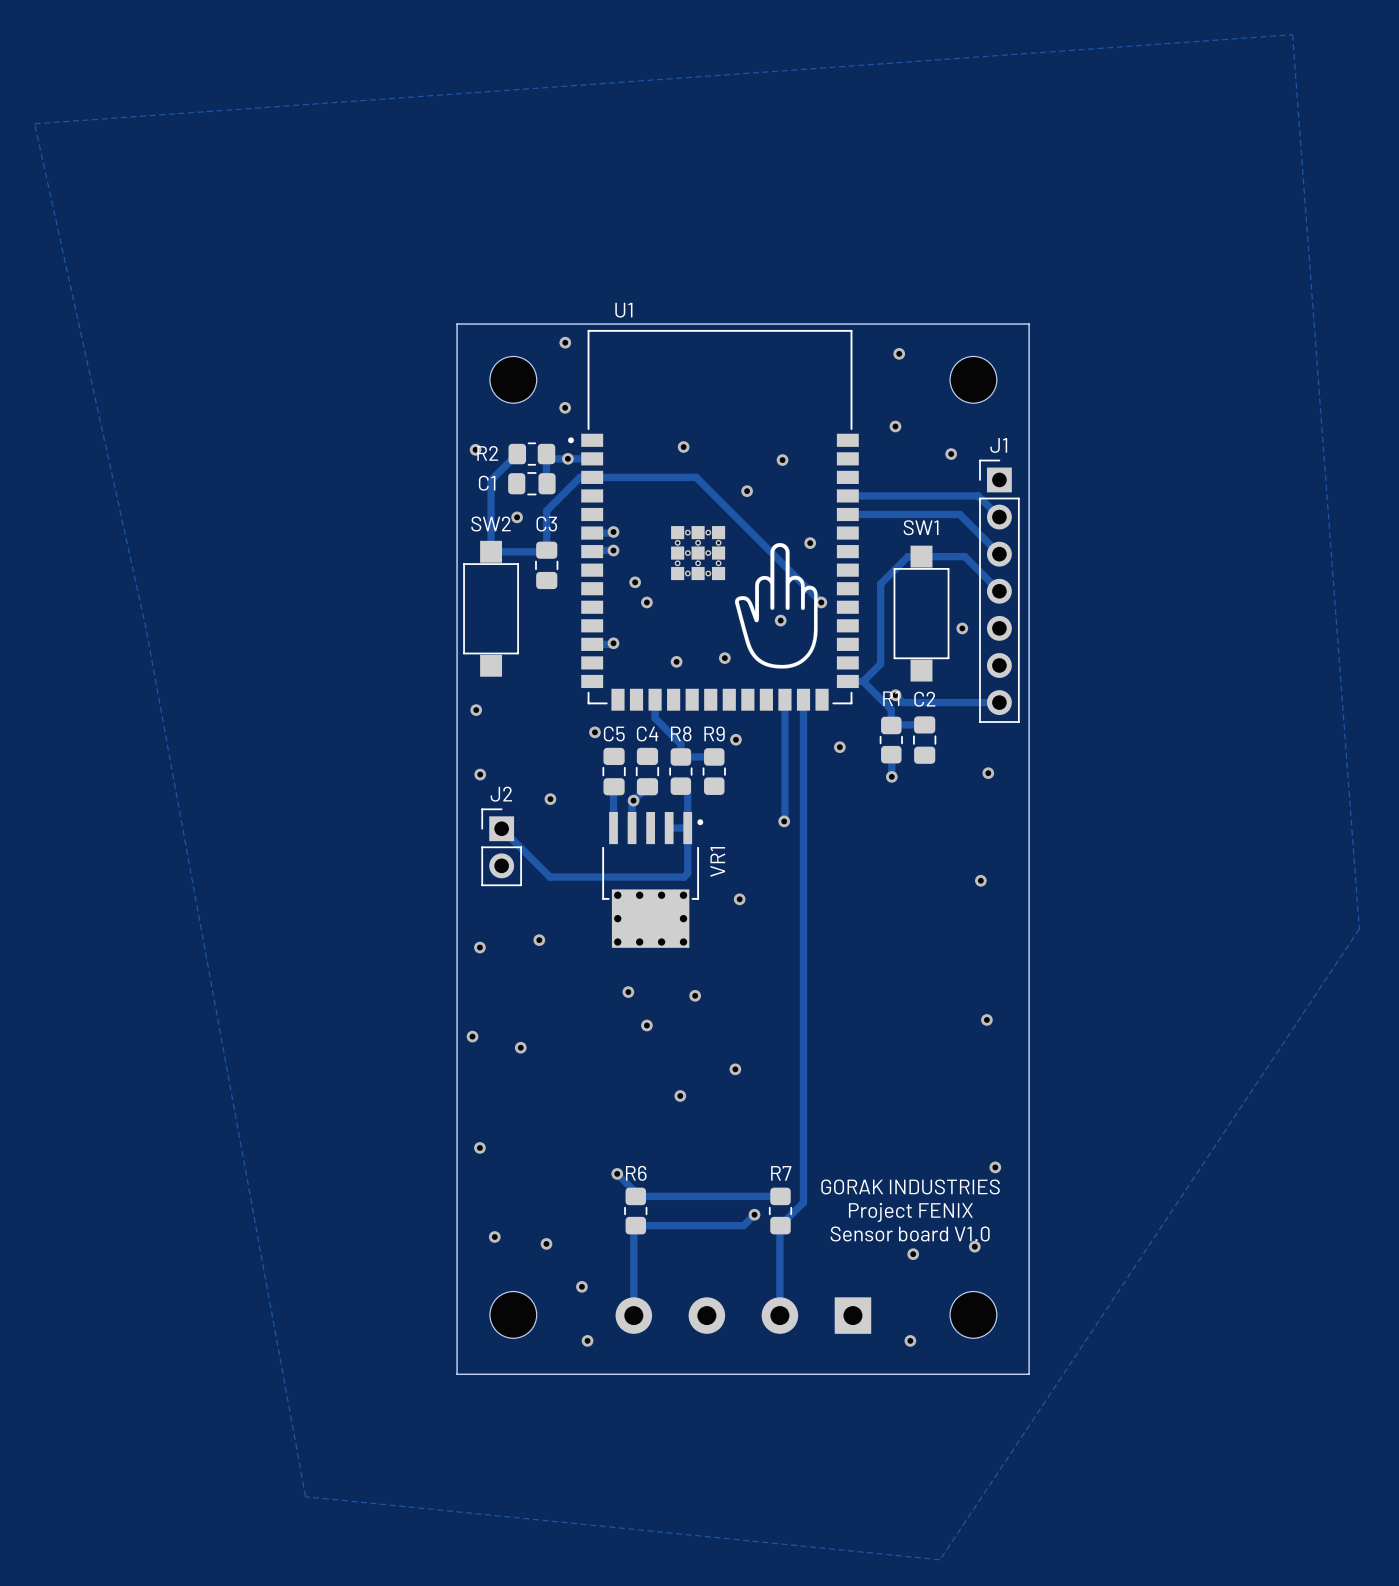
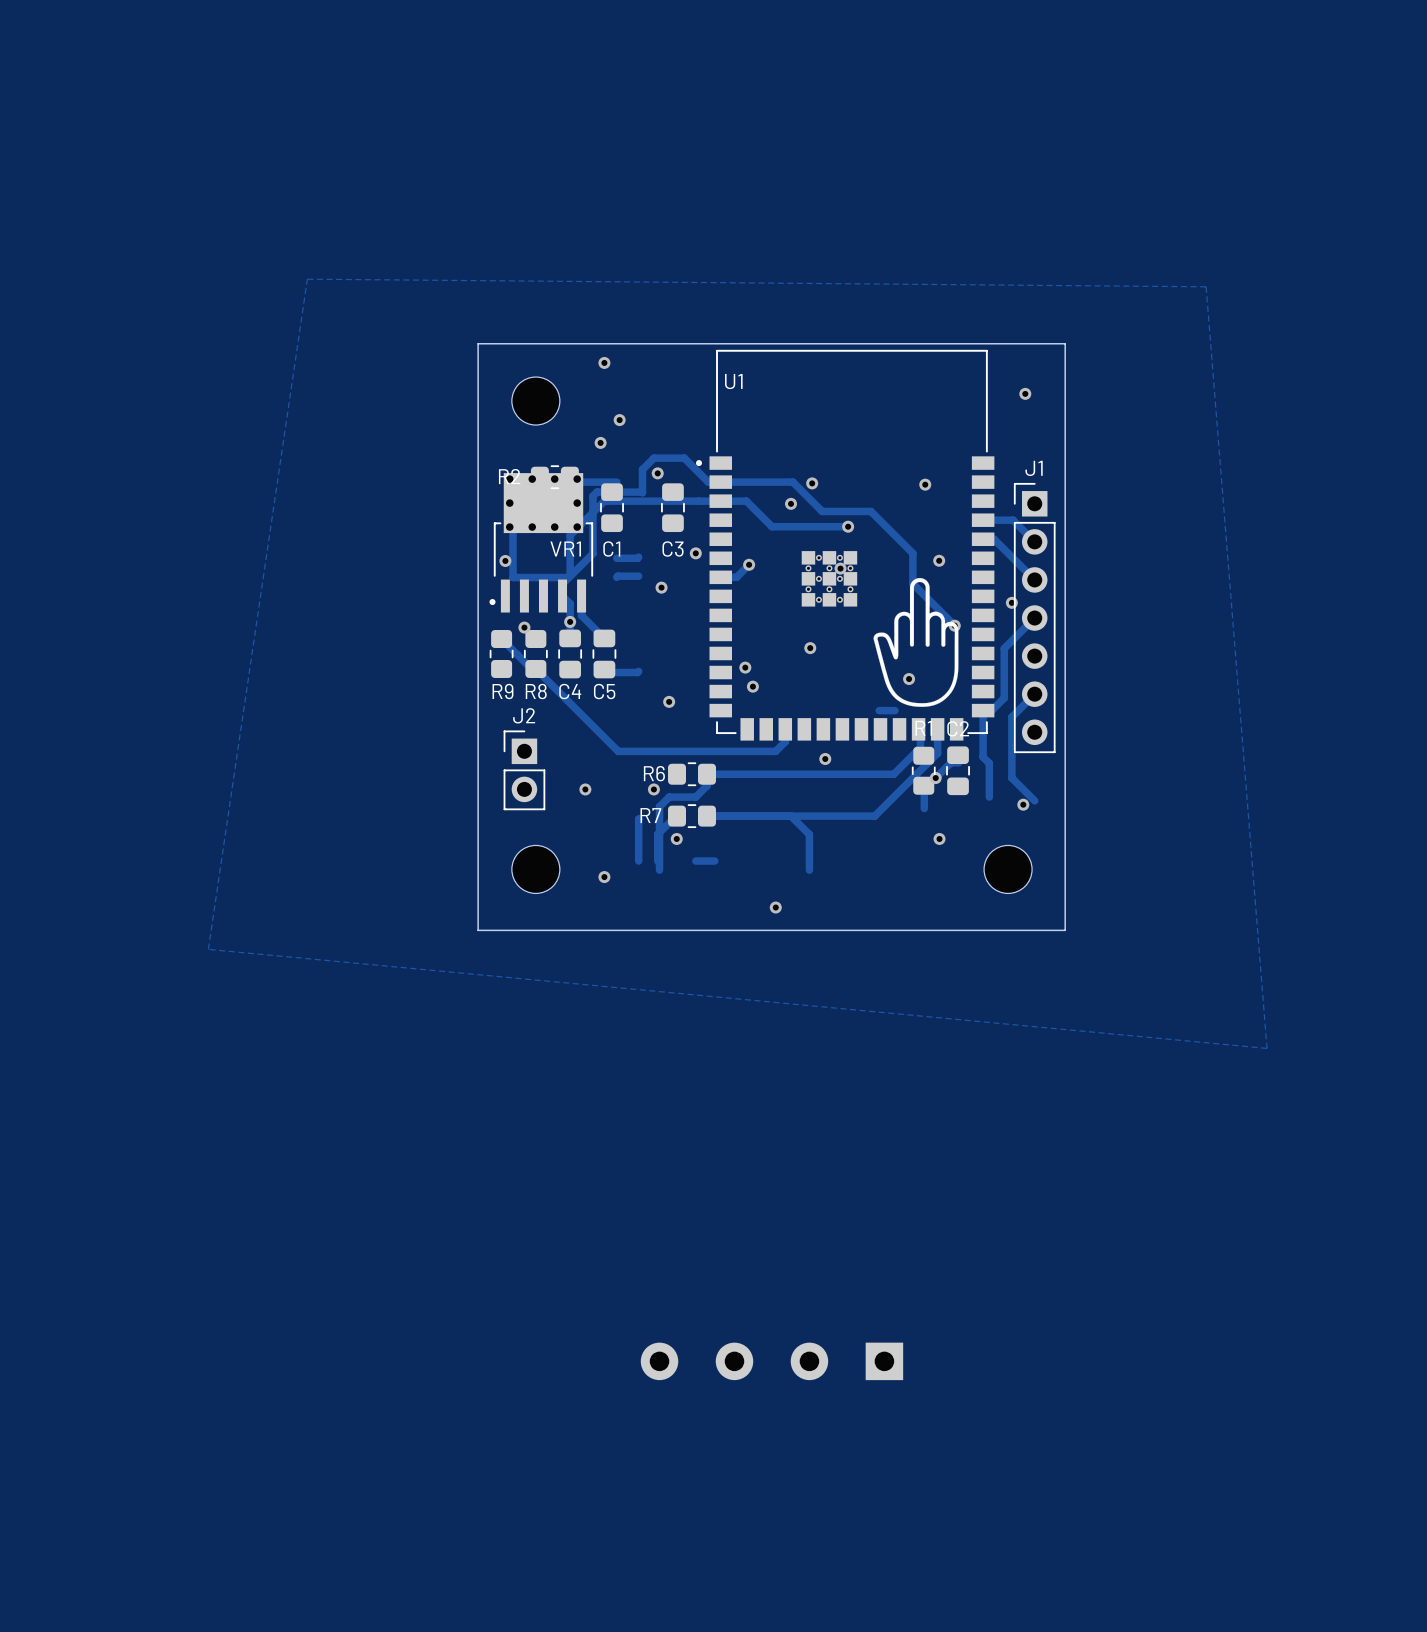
zone outline: (1292, 34) (34, 123) (145, 628) (305, 1496) (940, 1559) (1359, 929) (1292, 34) -> none
zone outline: none -> (307, 279) (208, 949) (1267, 1048) (1206, 286) (307, 279)
U1 name position: U1 (623, 310) -> U1 (733, 381)
via position: (565, 342) -> (604, 362)
via: (899, 353) -> none
via: none -> (1025, 393)
part: (973, 379) -> none
via: none -> (619, 420)
via: (565, 407) -> none
via: none -> (600, 442)
via: (895, 426) -> none
via: (683, 447) -> none
via: (475, 449) -> none
via: none -> (657, 473)
via: (951, 454) -> none
via: (567, 458) -> none
via: none -> (925, 484)
track: (696, 477) (821, 602) -> (723, 501) (746, 501) (771, 526) (848, 526)
C1 name position: C1 (487, 483) -> C1 (611, 549)
C1 rotation: 0° (531, 483) -> 90° clockwise (612, 507)
C1 position: (531, 483) -> (612, 507)
via position: (747, 491) -> (791, 503)
track: (847, 495) (949, 495) -> none
via: none -> (848, 526)
track: (847, 514) (949, 514) -> none
via position: (517, 517) -> (505, 560)
U1 position: (713, 520) -> (845, 545)
C3 name position: C3 (546, 524) -> C3 (673, 549)
via: none -> (695, 553)
via: (613, 531) -> none
via: none -> (939, 560)
track: none -> (749, 564) (736, 577) (720, 577)
via: none -> (749, 564)
via: (613, 550) -> none
via: none -> (661, 587)
C3 position: (546, 565) -> (672, 507)
track: none -> (581, 596) (581, 615) (604, 638)
via: none -> (1011, 602)
via: (635, 582) -> none
track: (999, 591) (964, 556) (907, 556) (880, 583) (880, 664) (863, 681) (891, 709) (891, 725) (924, 724) -> (1034, 618) (1004, 648) (1004, 698) (991, 710) (983, 710) (983, 757) (989, 763) (989, 797)
via: none -> (570, 621)
track: none -> (954, 625) (912, 583) (912, 553) (870, 511) (822, 511) (792, 482) (708, 482) (684, 458) (653, 458) (642, 469) (642, 492) (597, 492) (592, 496) (592, 553) (562, 584) (562, 596) (570, 603) (570, 638)
via: none -> (954, 625)
via: none -> (524, 627)
via: (646, 602) -> none
via: (821, 602) -> none
drawing position: (776, 605) -> (916, 642)
SW2: (491, 608) -> none
track: none -> (501, 639) (531, 668) (535, 668) (618, 751) (775, 751) (785, 741) (785, 729)
SW1: (921, 613) -> none
via: (962, 628) -> none
via: none -> (745, 667)
via: (613, 643) -> none
via: none -> (909, 679)
via: (676, 661) -> none
track: none -> (1034, 694) (1011, 717) (1011, 778) (1034, 800)
via: none -> (669, 701)
track: (895, 695) (902, 702) (999, 702) -> none
via: (895, 695) -> none
track: (655, 699) (655, 718) (680, 744) (680, 756) (714, 756) -> none
track: (784, 699) (784, 821) -> none
track: (803, 699) (803, 1202) (779, 1226) (779, 1315) -> none
track: none -> (918, 729) (920, 731) (920, 747) (893, 774) (706, 774) (706, 785) (695, 797) (669, 797) (659, 806) (659, 870)
track: none -> (937, 729) (937, 753) (874, 816) (706, 816)
via: (476, 710) -> none
via: none -> (825, 759)
via: (594, 732) -> none
track: none -> (958, 762) (950, 762) (935, 778)
C5 name position: C5 (614, 733) -> C5 (604, 691)
C4 name position: C4 (647, 733) -> C4 (570, 691)
R8 name position: R8 (681, 733) -> R8 (536, 691)
R9 name position: R9 (714, 733) -> R9 (502, 691)
via: (735, 739) -> none
via: (839, 747) -> none
via: none -> (935, 778)
via: none -> (585, 789)
via: none -> (653, 789)
C5 position: (614, 771) -> (604, 653)
C4 position: (647, 771) -> (570, 653)
R8 position: (680, 771) -> (535, 653)
R9 position: (714, 771) -> (501, 653)
via: (480, 774) -> none
via: (891, 776) -> none
track: none -> (791, 816) (809, 834) (809, 870)
track: (680, 786) (687, 793) (687, 873) (684, 877) (549, 877) (501, 828) -> none
via: (550, 799) -> none
via position: (633, 800) -> (676, 838)
via: none -> (939, 838)
via: (784, 821) -> none
part: none -> (535, 869)
part: none -> (1008, 869)
via: none -> (604, 877)
J2 position: (501, 847) -> (524, 770)
VR1 name position: VR1 (717, 861) -> VR1 (565, 548)
VR1 rotation: 0° (652, 879) -> 180° (541, 542)
VR1 position: (652, 879) -> (541, 542)
via: (980, 880) -> none
board edge: (457, 895) (457, 1374) (1029, 1374) (1029, 895) -> (478, 930) (1065, 930)
via position: (739, 899) -> (775, 907)
via: (539, 940) -> none
via: (479, 947) -> none
via: (628, 992) -> none
via: (695, 995) -> none
via: (986, 1019) -> none
via: (646, 1025) -> none
via: (472, 1036) -> none
via: (520, 1047) -> none
via: (735, 1069) -> none
via: (680, 1095) -> none
via: (479, 1147) -> none
via: (995, 1167) -> none
track: (617, 1173) (635, 1192) (635, 1196) (780, 1196) -> none
via: (617, 1173) -> none
R6 name position: R6 (636, 1173) -> R6 (654, 773)
R7 name position: R7 (781, 1173) -> R7 (650, 815)
text: GORAK INDUSTRIES (910, 1186) -> none
R6 rotation: 0° (635, 1211) -> 90° clockwise (692, 774)
R6 position: (635, 1211) -> (692, 774)
R7 rotation: 0° (780, 1211) -> 90° clockwise (692, 816)
R7 position: (780, 1211) -> (692, 816)
text: Project FENIX (910, 1212) -> none
track: (754, 1214) (743, 1225) (635, 1225) (633, 1227) (633, 1315) -> none
via: (754, 1214) -> none
text: Sensor board V1.0 (910, 1233) -> none
via: (494, 1236) -> none
via: (546, 1243) -> none
via: (974, 1246) -> none
via: (913, 1254) -> none
via: (581, 1286) -> none
part: (513, 1314) -> none
part: (973, 1314) -> none
via: (587, 1340) -> none
via: (910, 1340) -> none

